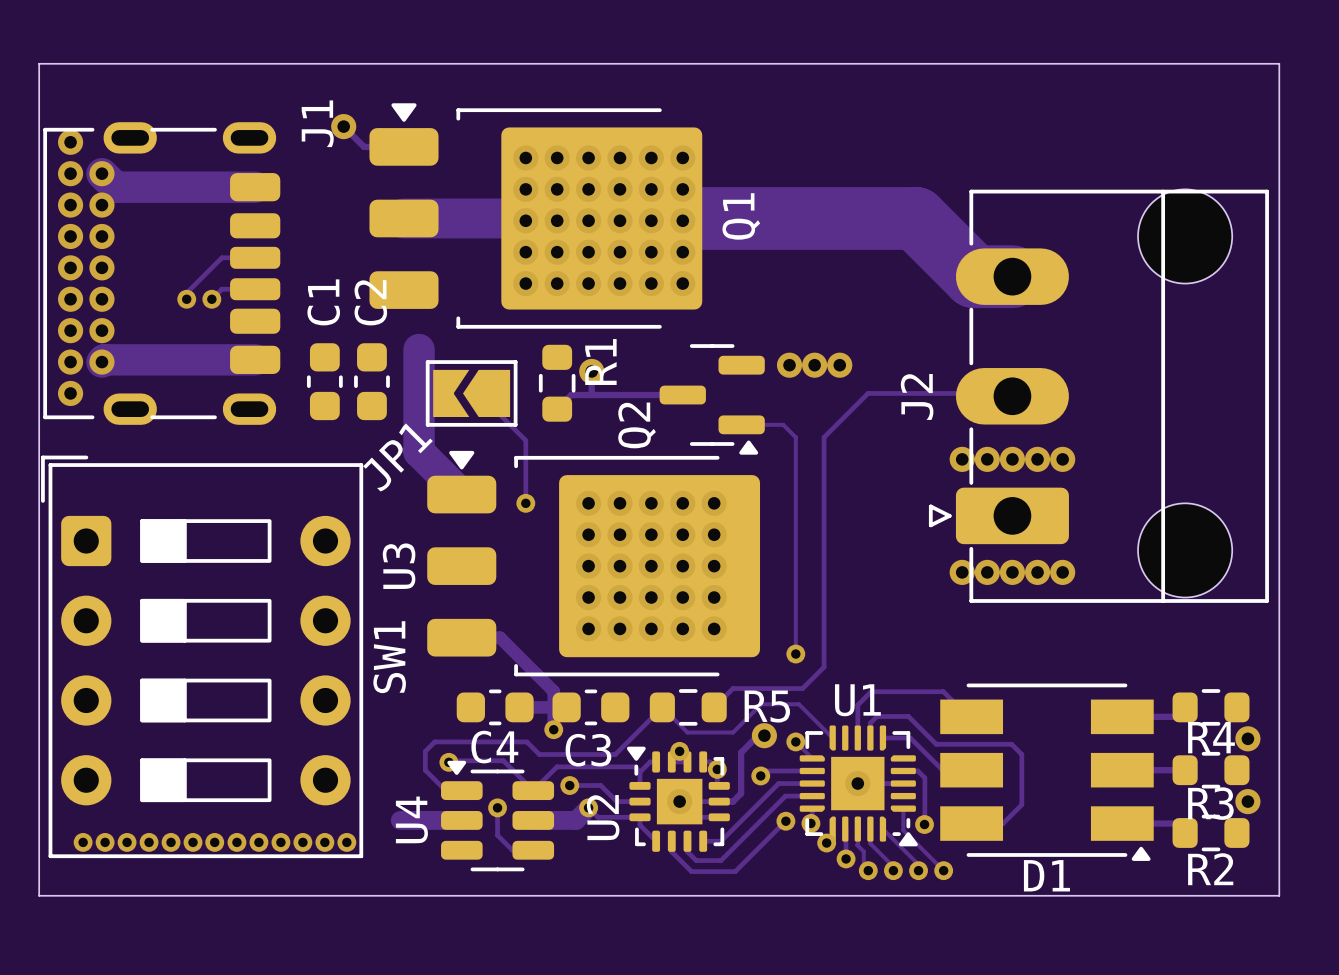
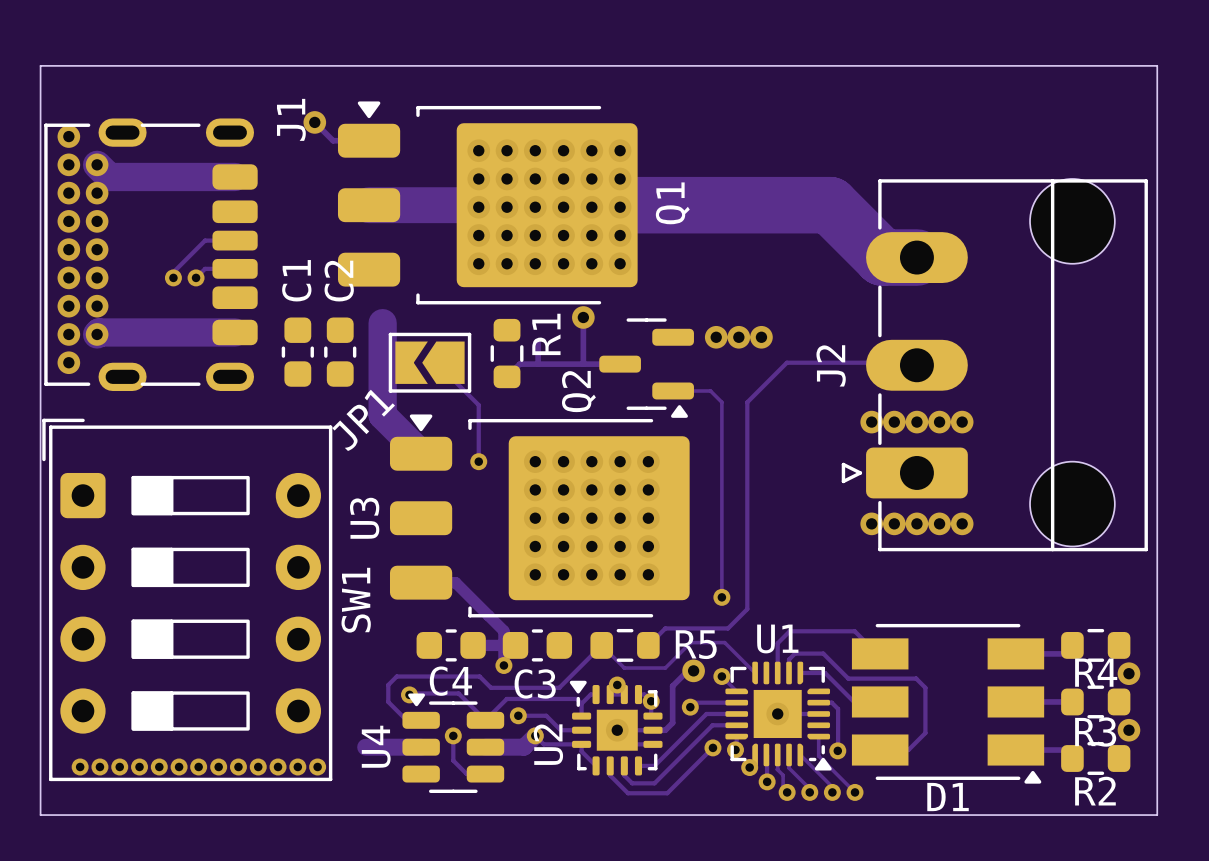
track: none -> (583, 317) (583, 364)
via position: (591, 371) -> (583, 317)

